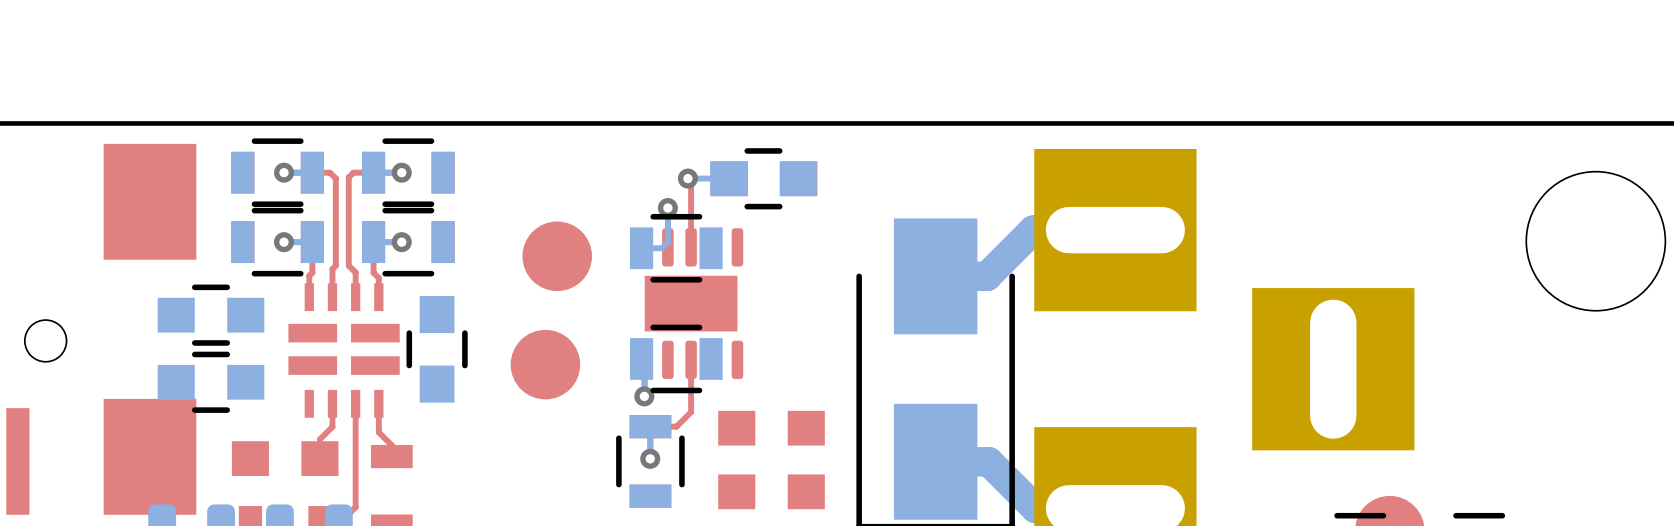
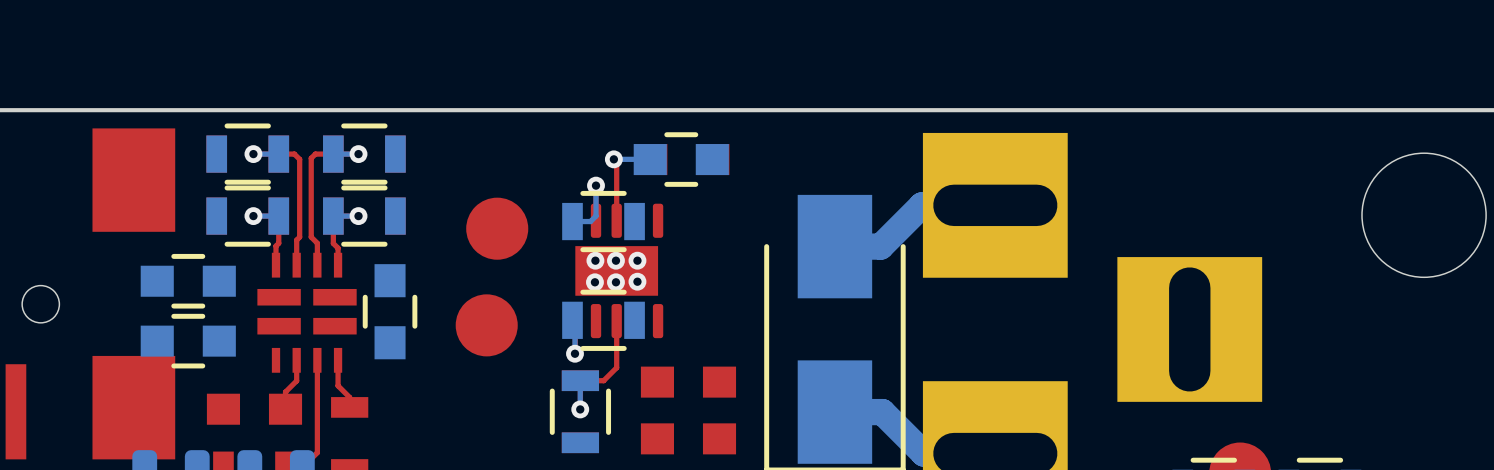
via: none -> (595, 260)
via: none -> (615, 260)
via: none -> (637, 260)
via: none -> (637, 281)
via: none -> (594, 282)
via: none -> (615, 282)

